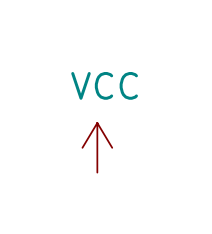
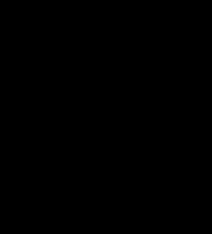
power symbol: VCC (97, 147) -> none

